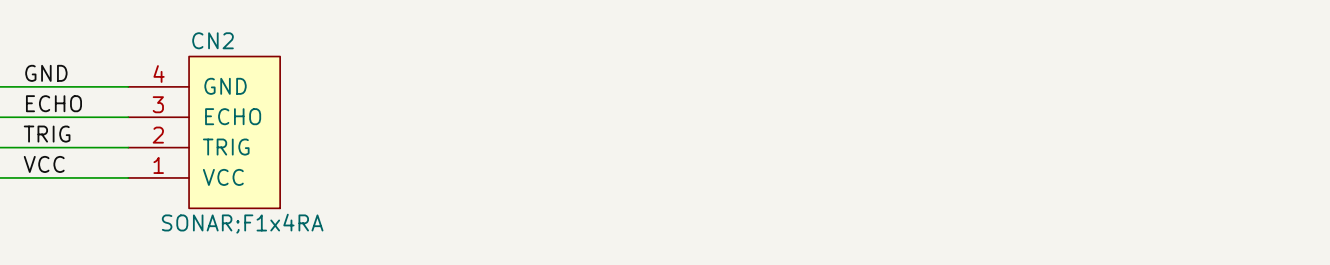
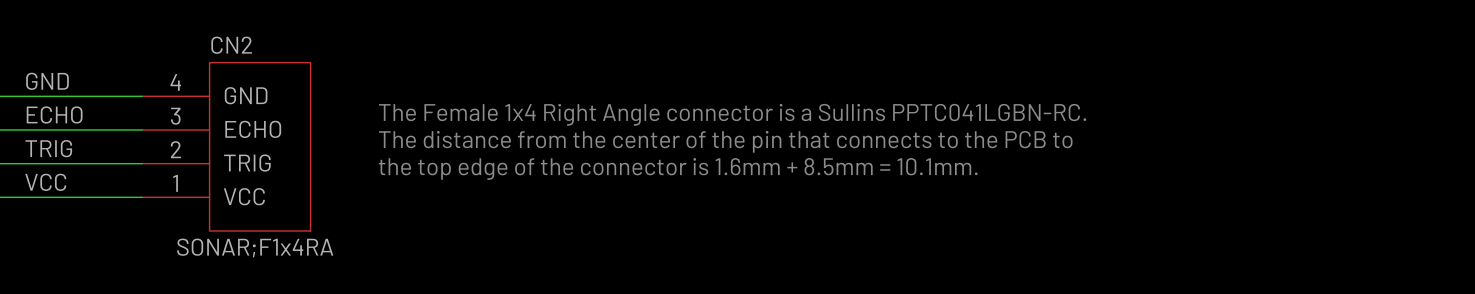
text: none -> The Female 1x4 Right Angle connector is a Sullins PPTC041LGBN-RC. (732, 114)
text: none -> The distance from the center of the pin that connects to the PCB to (725, 141)
text: none -> the top edge of the connector is 1.6mm + 8.5mm = 10.1mm. (678, 168)

